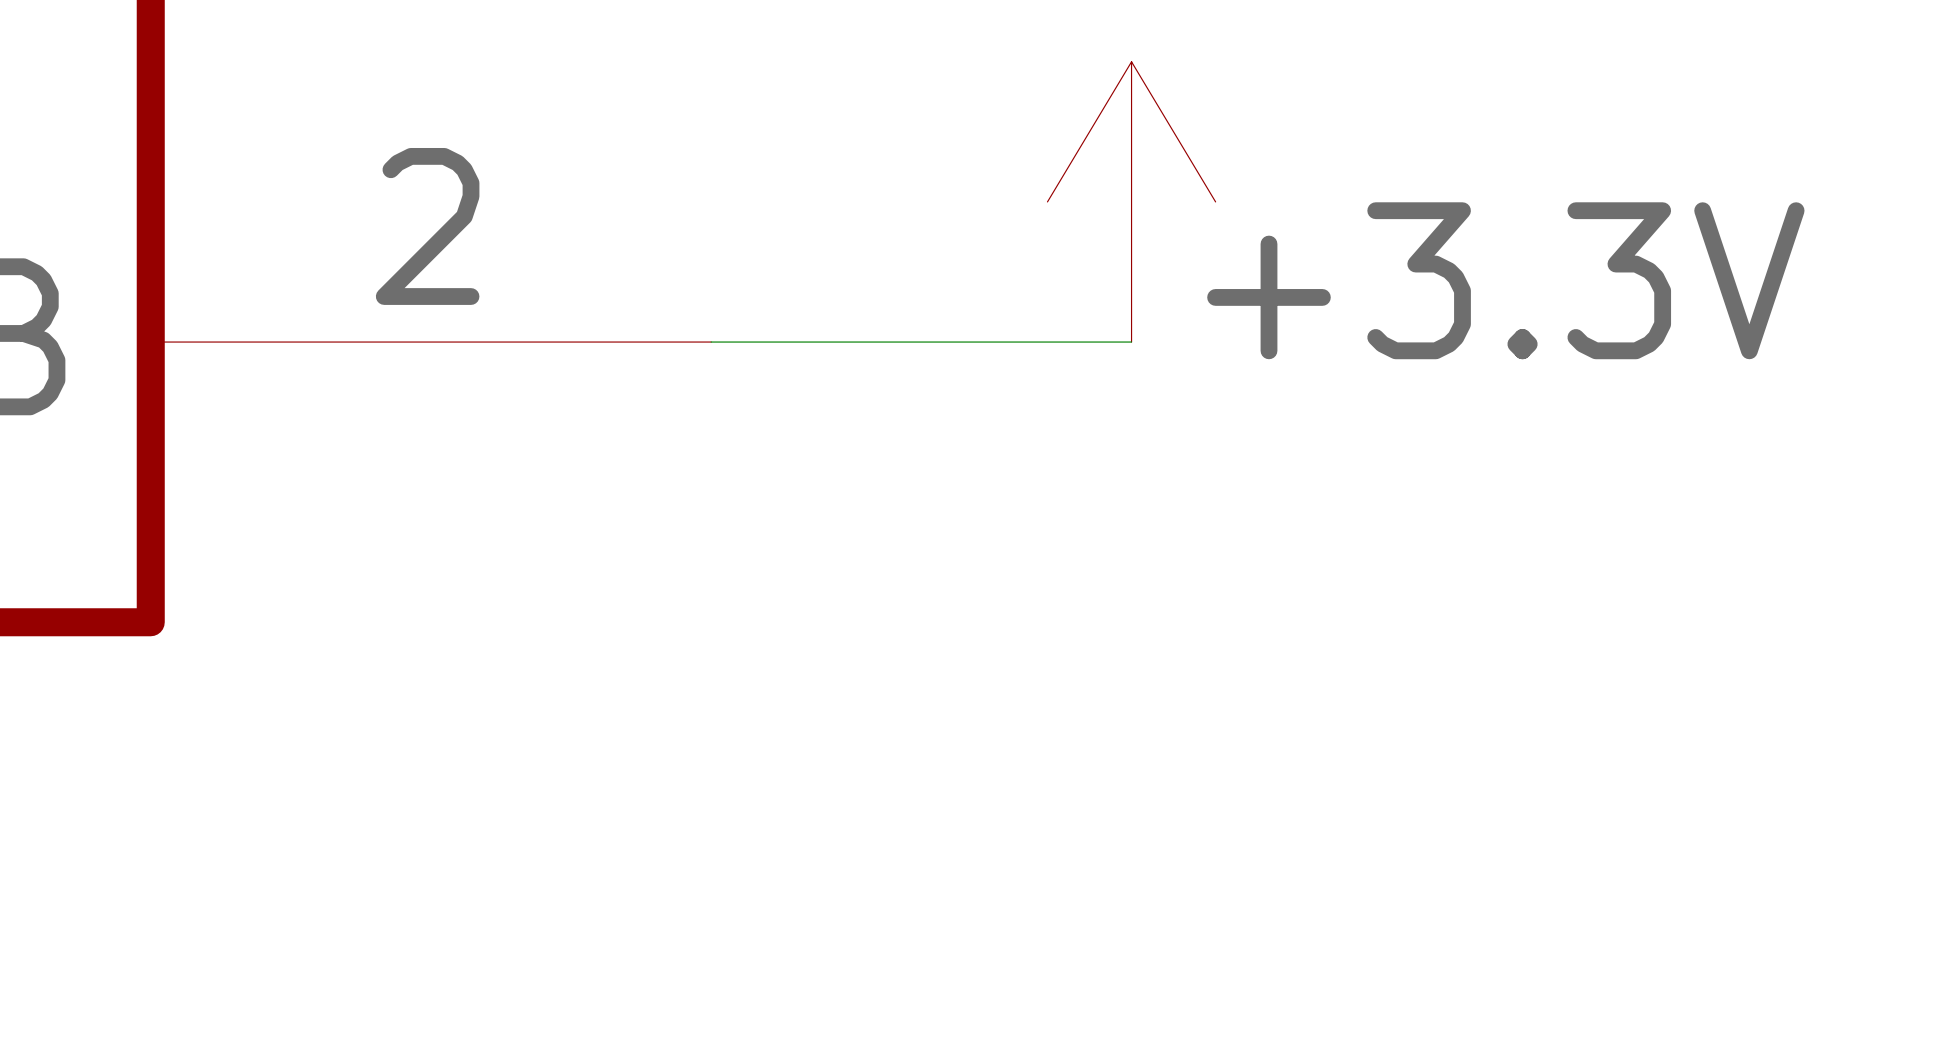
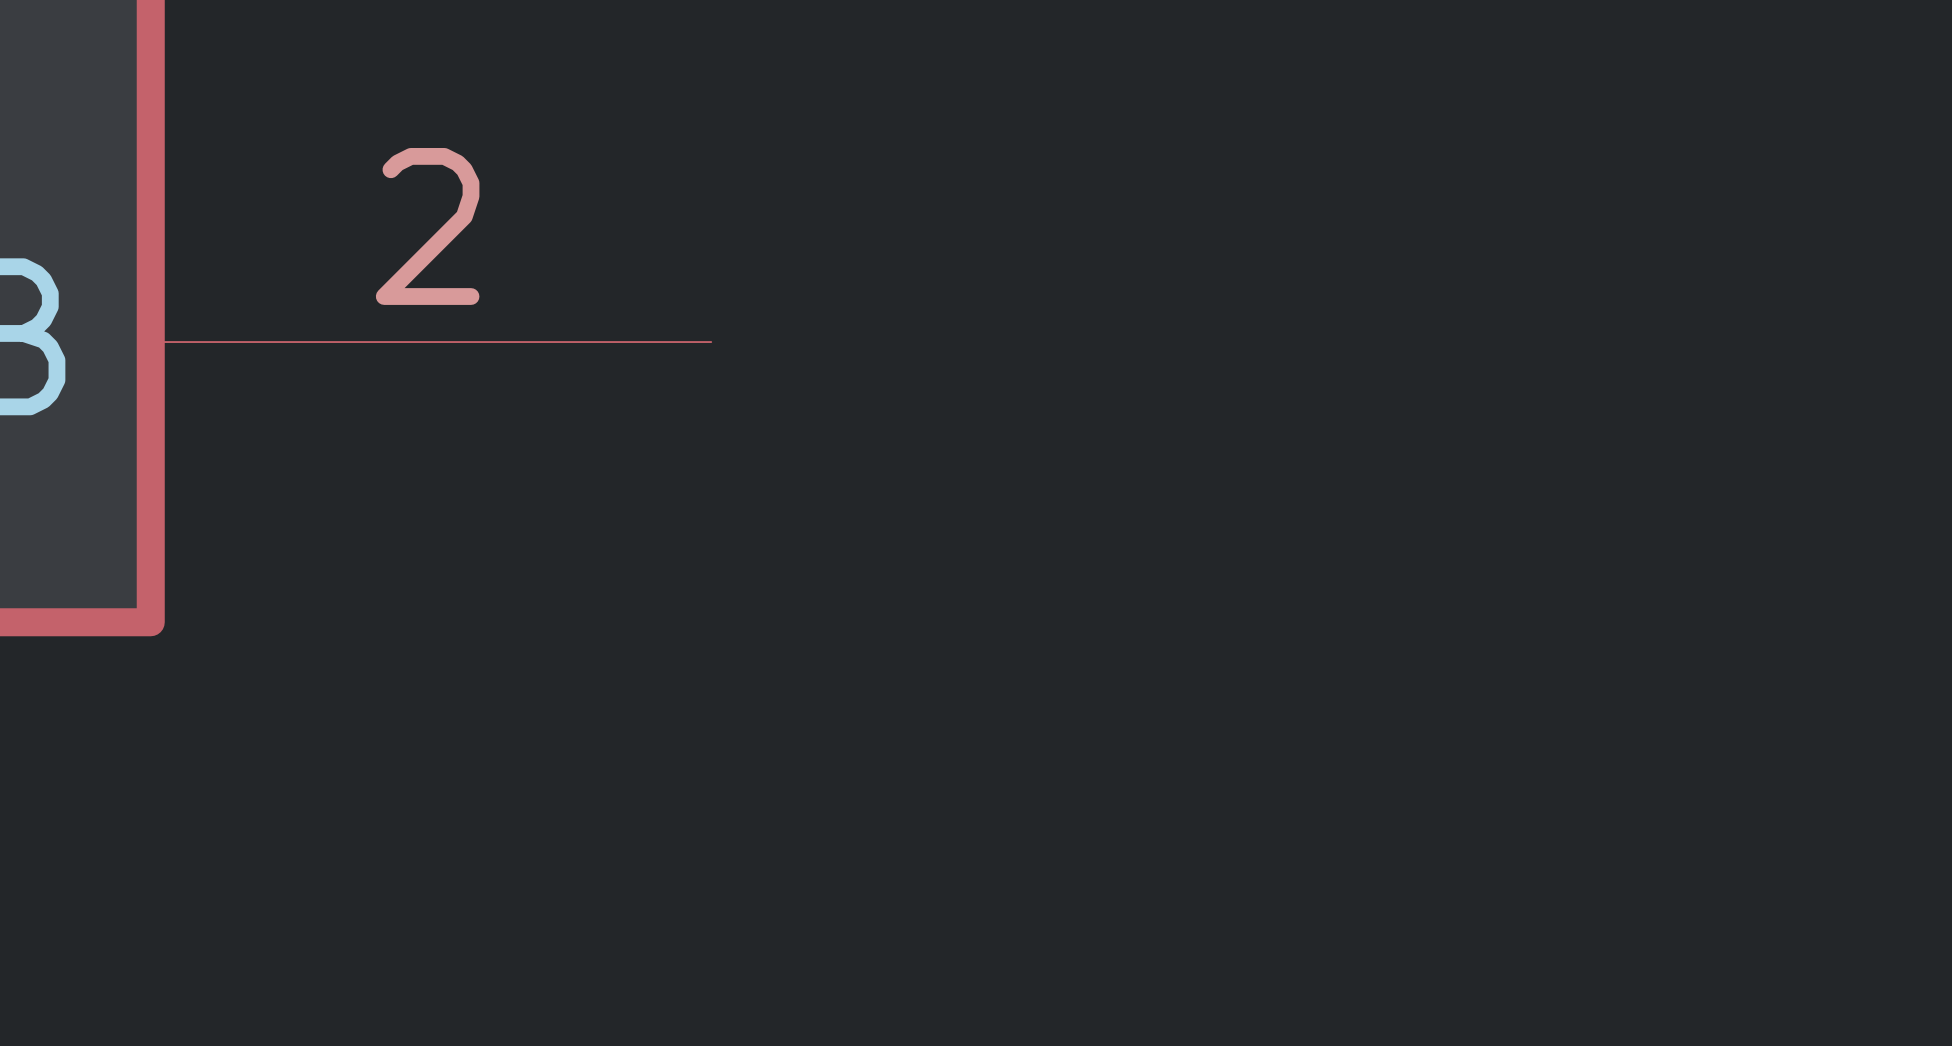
power symbol: +3.3V (1131, 201) -> none
wire: (711, 342) (1131, 342) -> none

